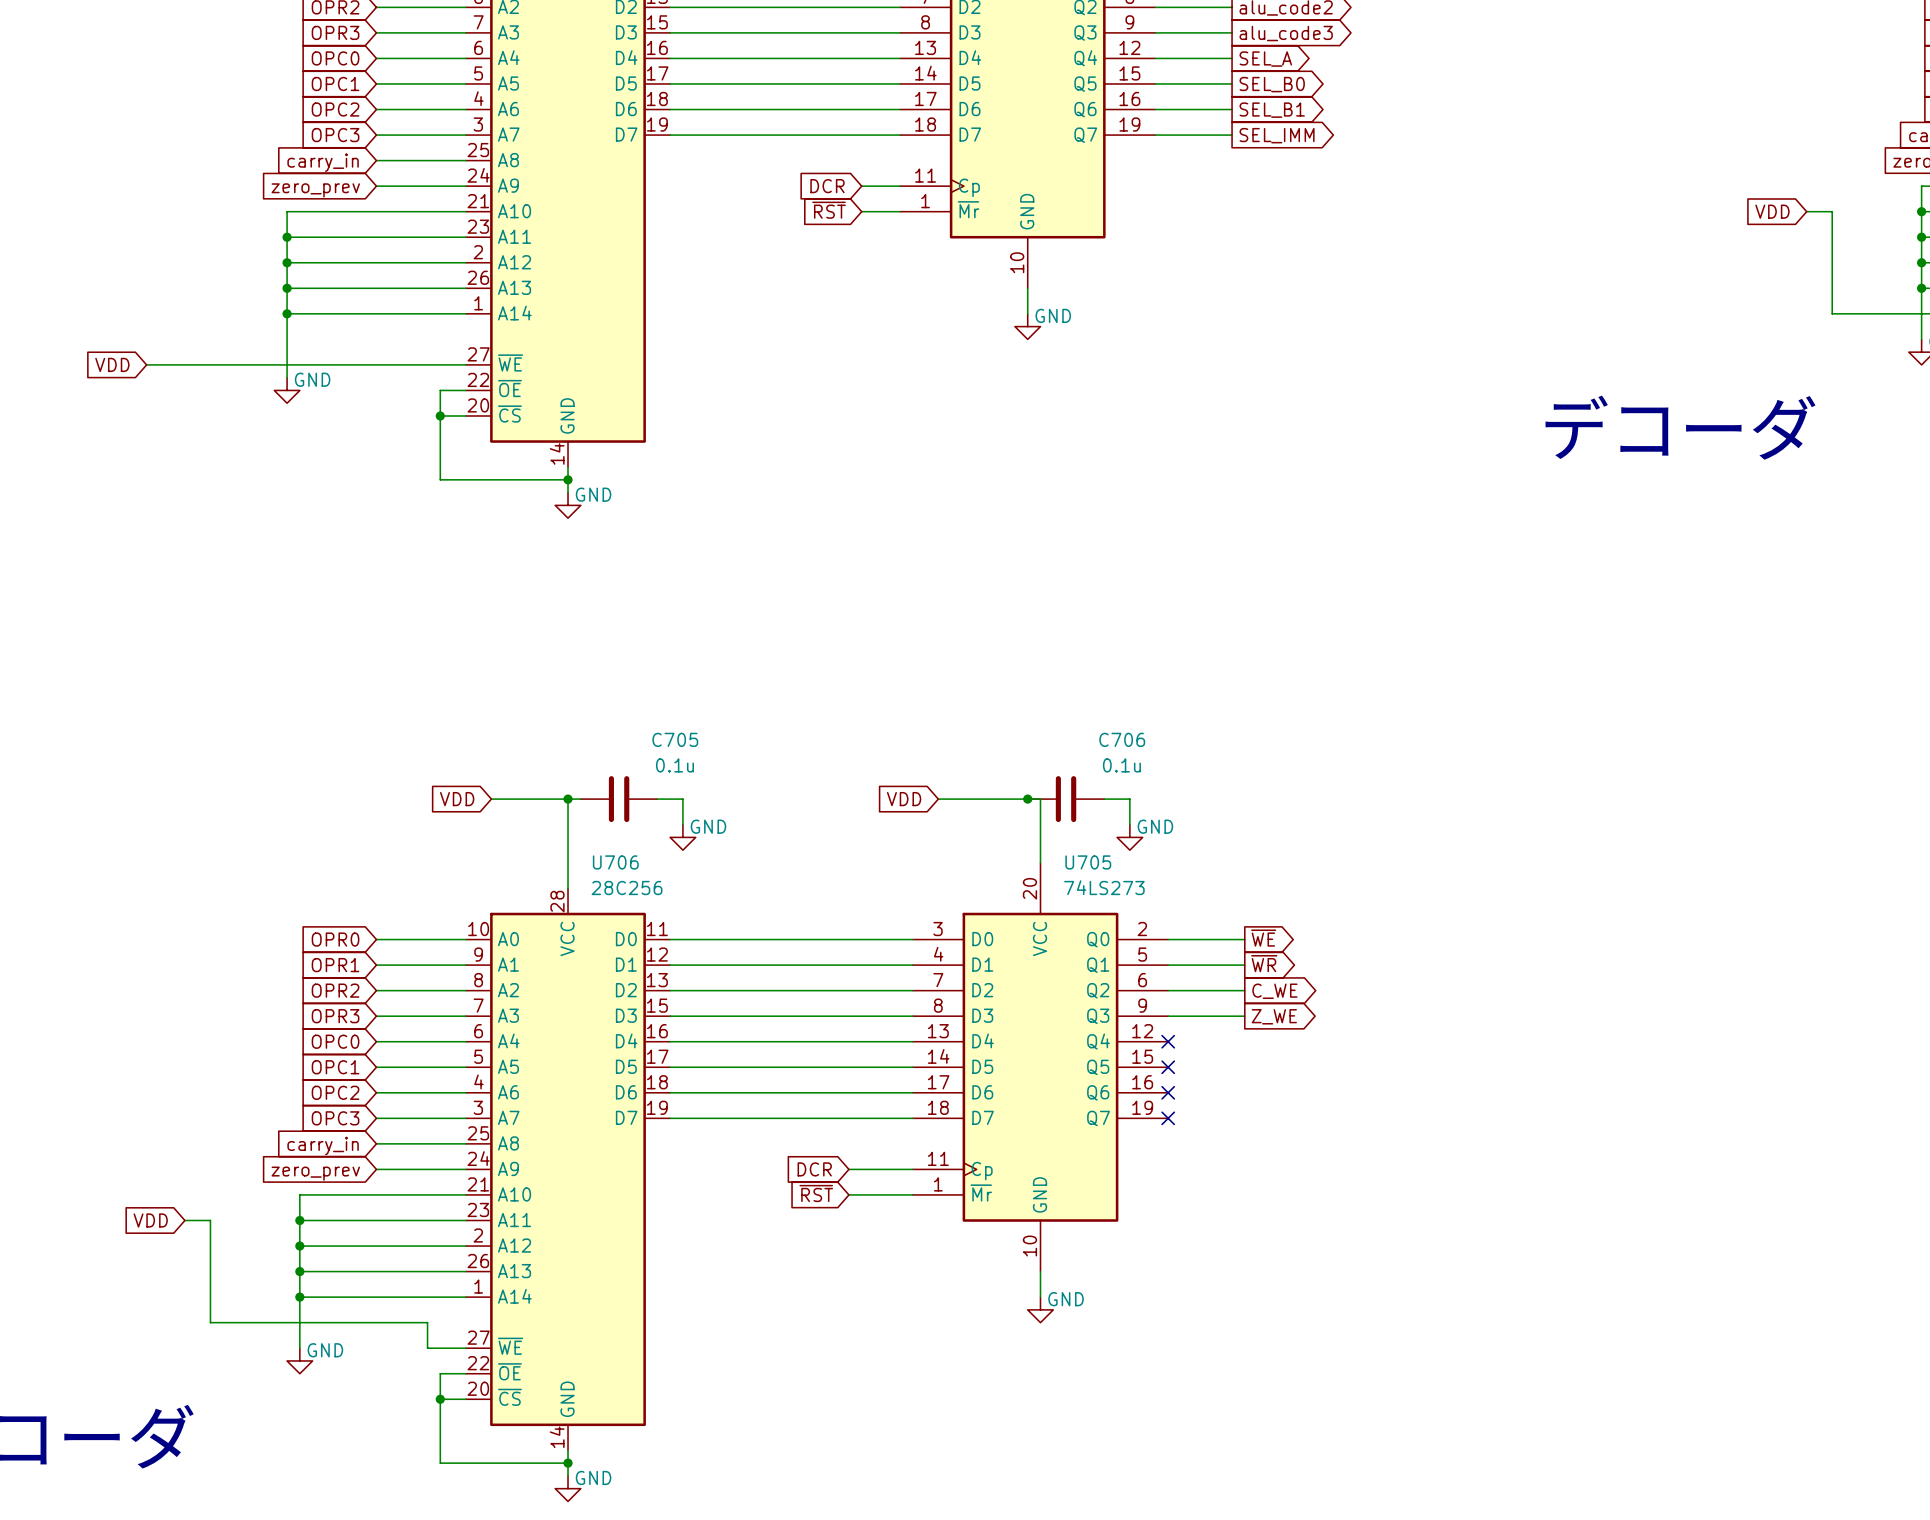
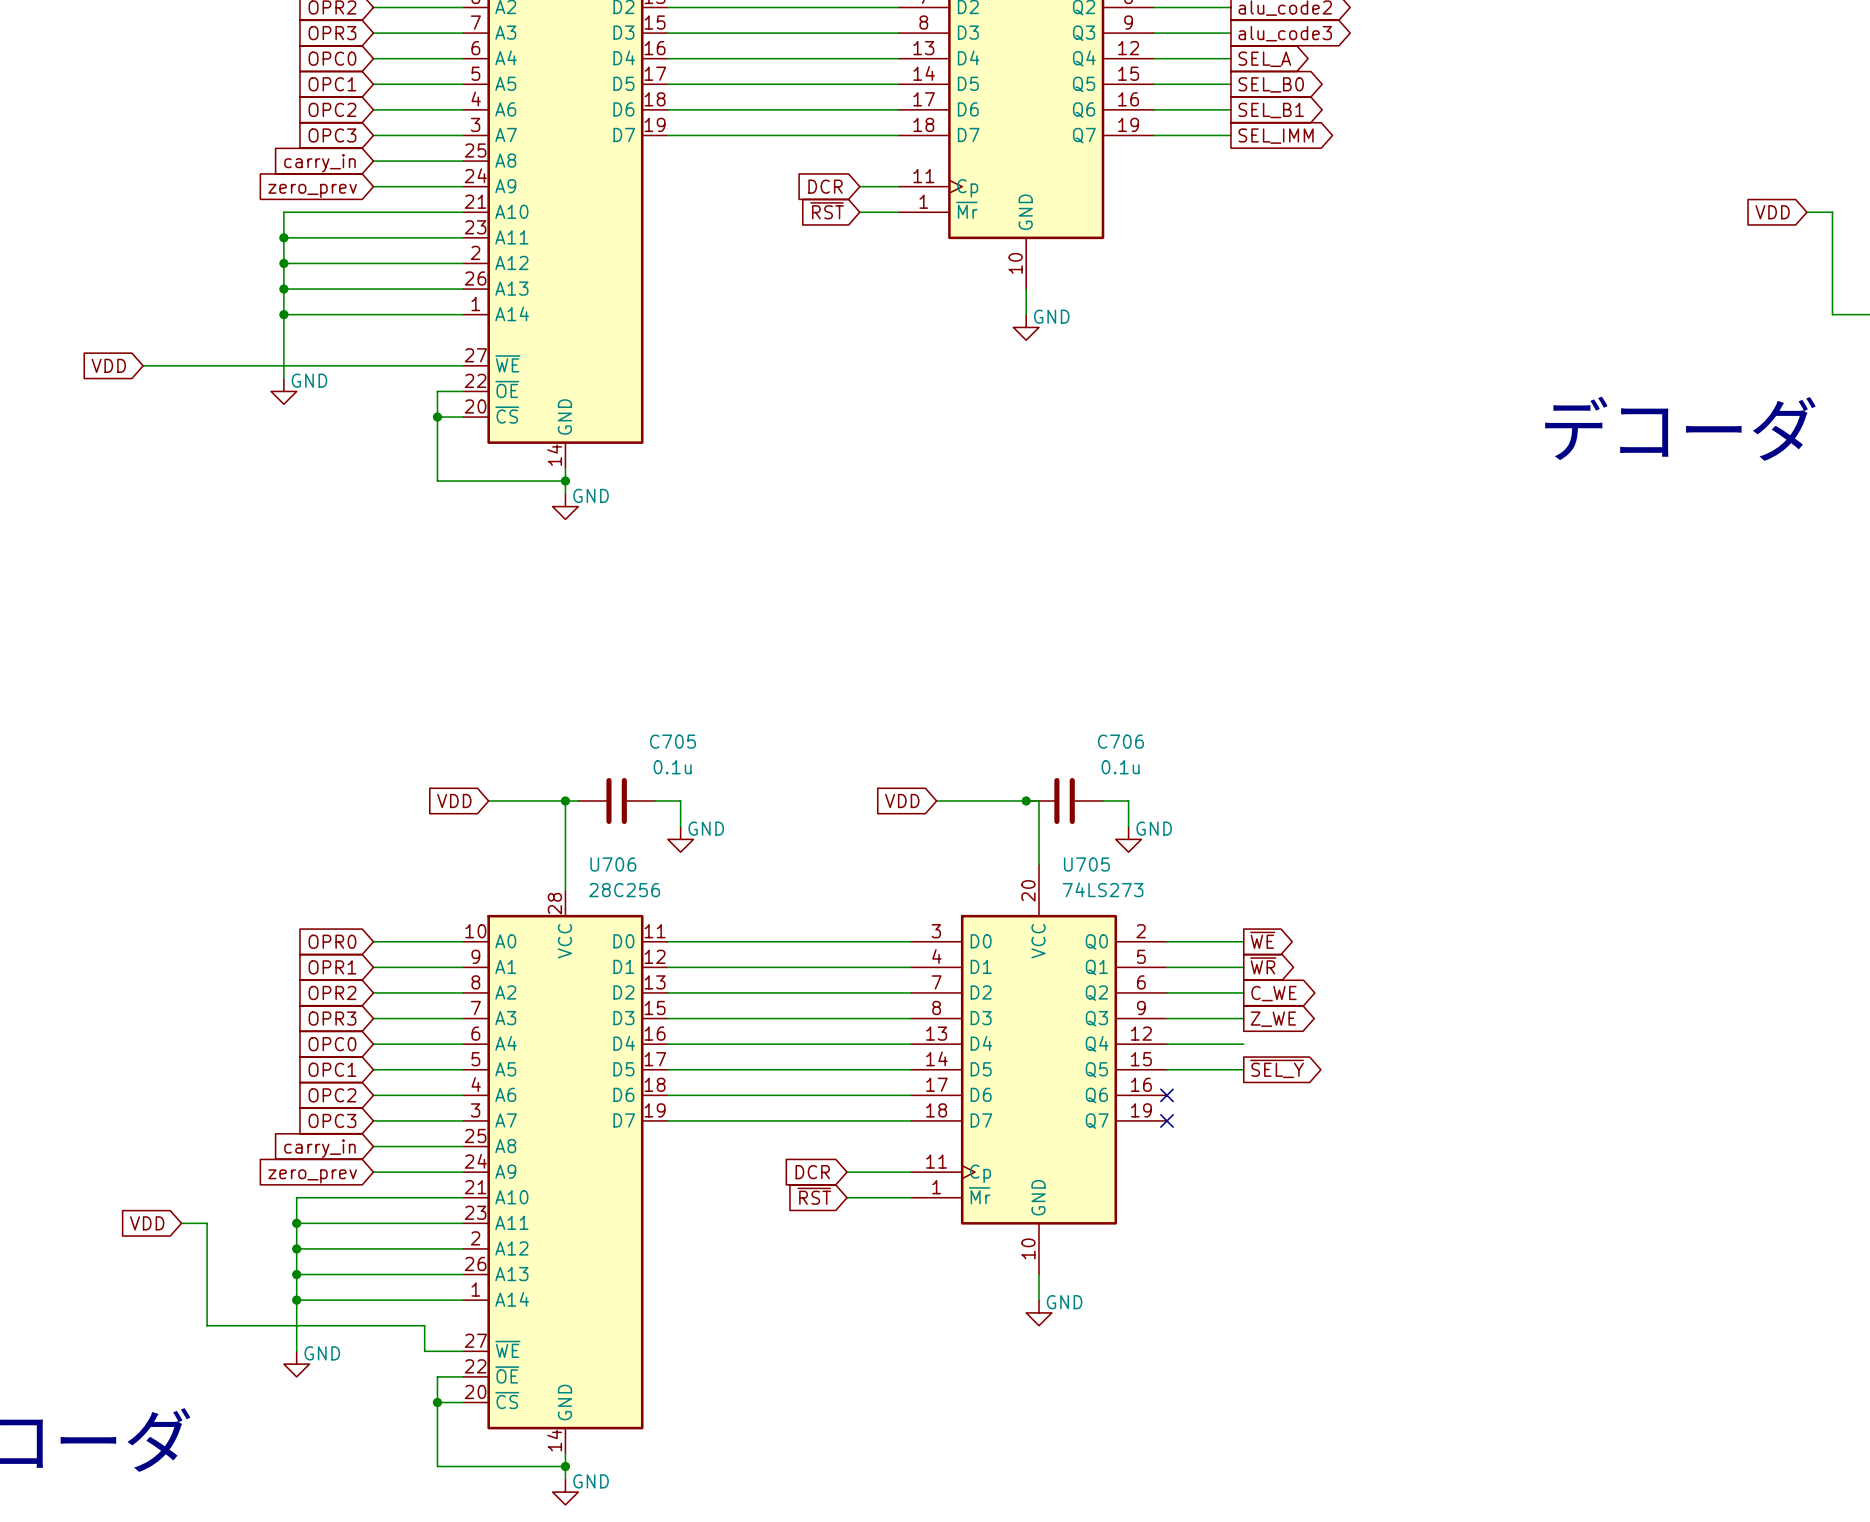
wire: none -> (1166, 1044) (1243, 1044)
no-connect mark: (1168, 1041) -> none
global label: none -> ~{SEL_Y} (1277, 1068)
wire: none -> (1166, 1069) (1243, 1069)
no-connect mark: (1168, 1067) -> none

